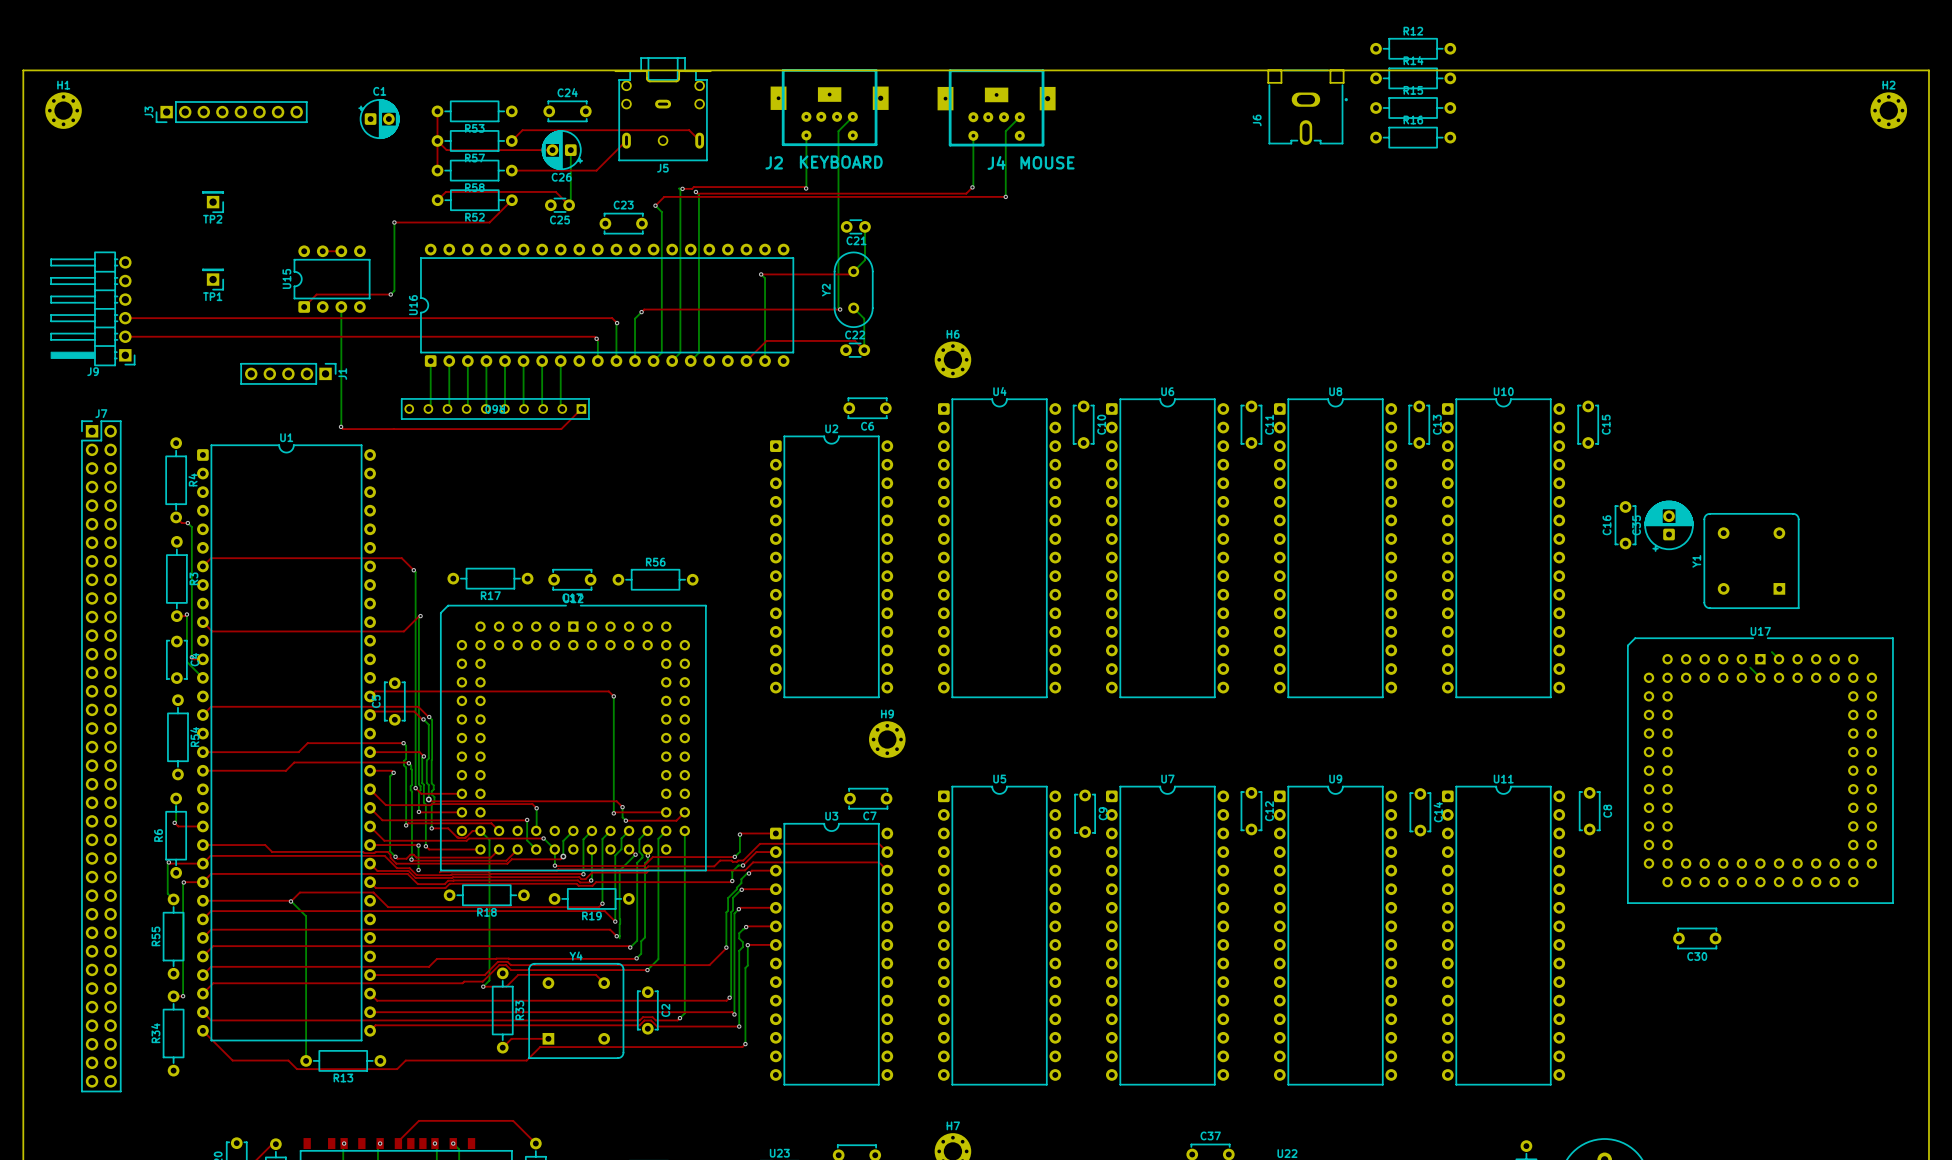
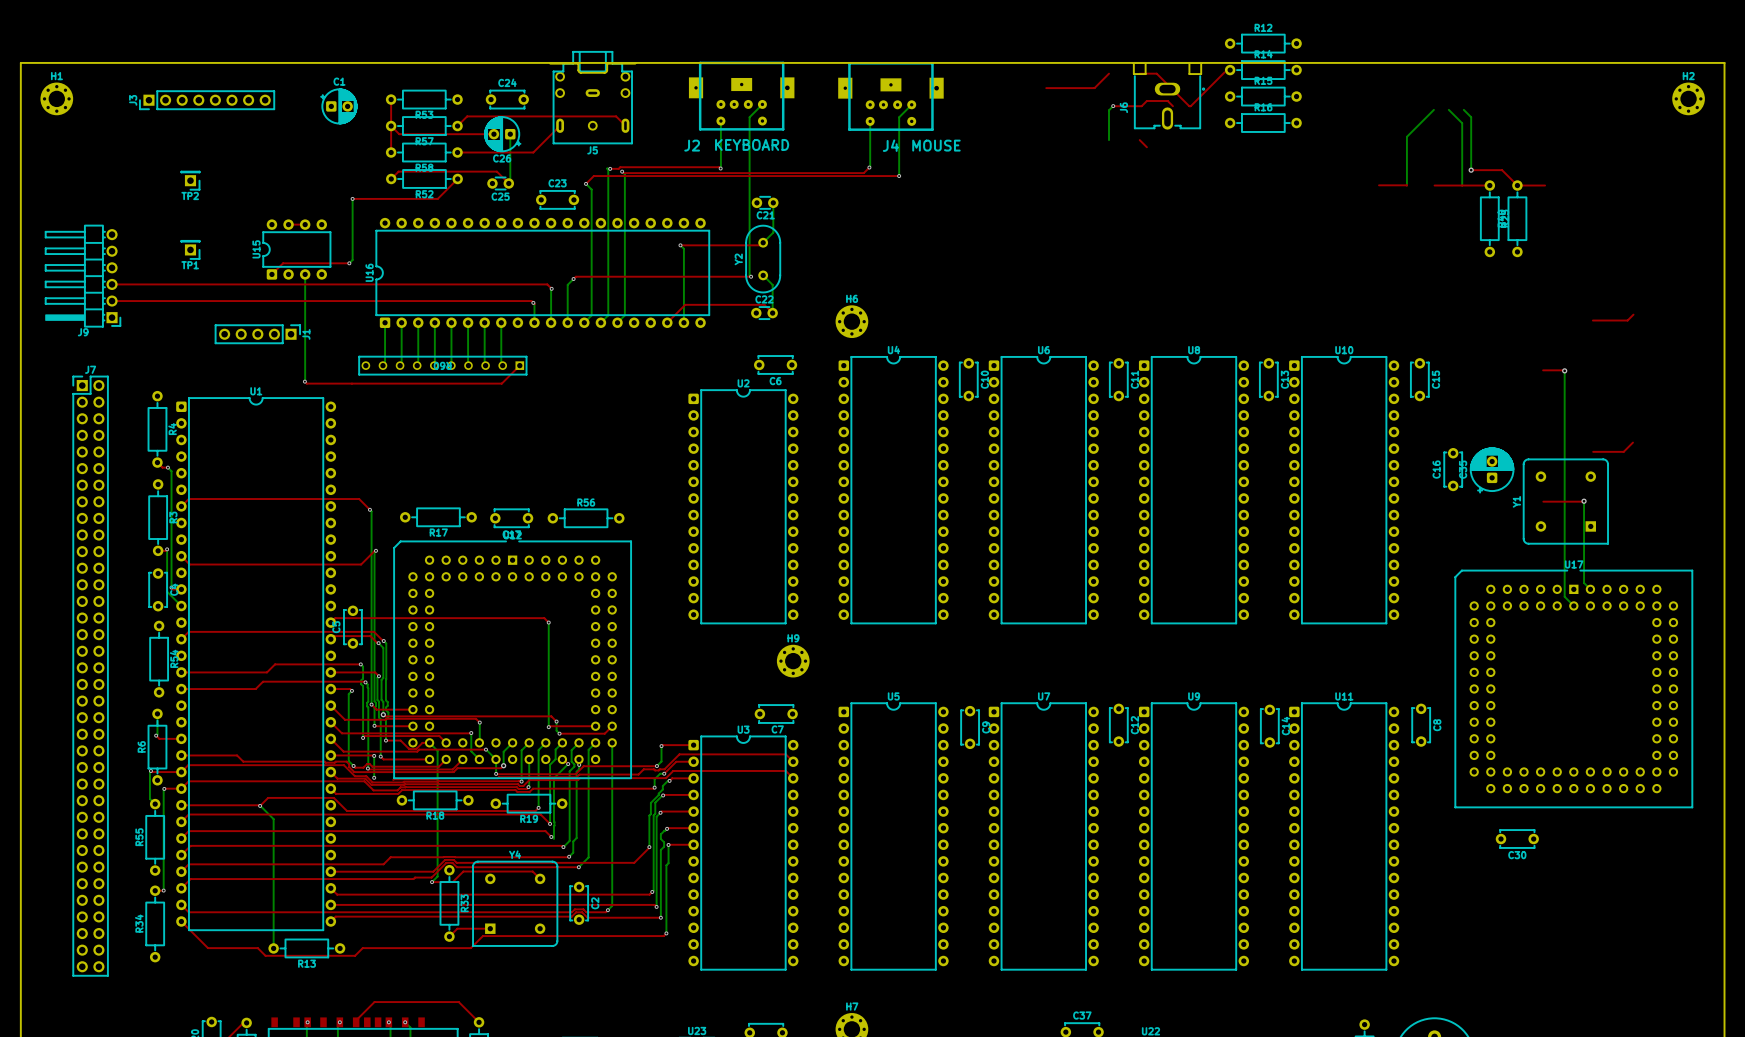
top track: none -> (1224, 72) (1190, 106) (1156, 73) (1139, 73)
top track: none -> (1109, 73) (1094, 88) (1046, 88)
top track: none -> (1113, 106) (1141, 106) (1146, 100) (1167, 100) (1172, 106)
bottom track: none -> (1113, 106) (1109, 110) (1109, 140)
via: none -> (1113, 106)
bottom track: none -> (1433, 109) (1406, 136) (1406, 185)
bottom track: none -> (1448, 109) (1462, 123) (1462, 185)
bottom track: none -> (1463, 109) (1471, 117) (1471, 170)
top track: none -> (1139, 140) (1146, 147)
top track: none -> (1471, 170) (1502, 170) (1517, 185) (1545, 185)
via: none -> (1471, 170)
top track: none -> (1379, 185) (1406, 185)
top track: none -> (1434, 185) (1489, 185)
part: none -> (1489, 218)
part: none -> (1517, 218)
top track: none -> (1633, 314) (1627, 320) (1592, 320)
top track: none -> (1543, 370) (1564, 370)
bottom track: none -> (1564, 370) (1564, 596)
via: none -> (1564, 370)
top track: none -> (1632, 442) (1623, 451) (1593, 451)
top track: none -> (1584, 501) (1543, 501)
bottom track: none -> (1584, 501) (1584, 582)
via: none -> (1584, 501)

